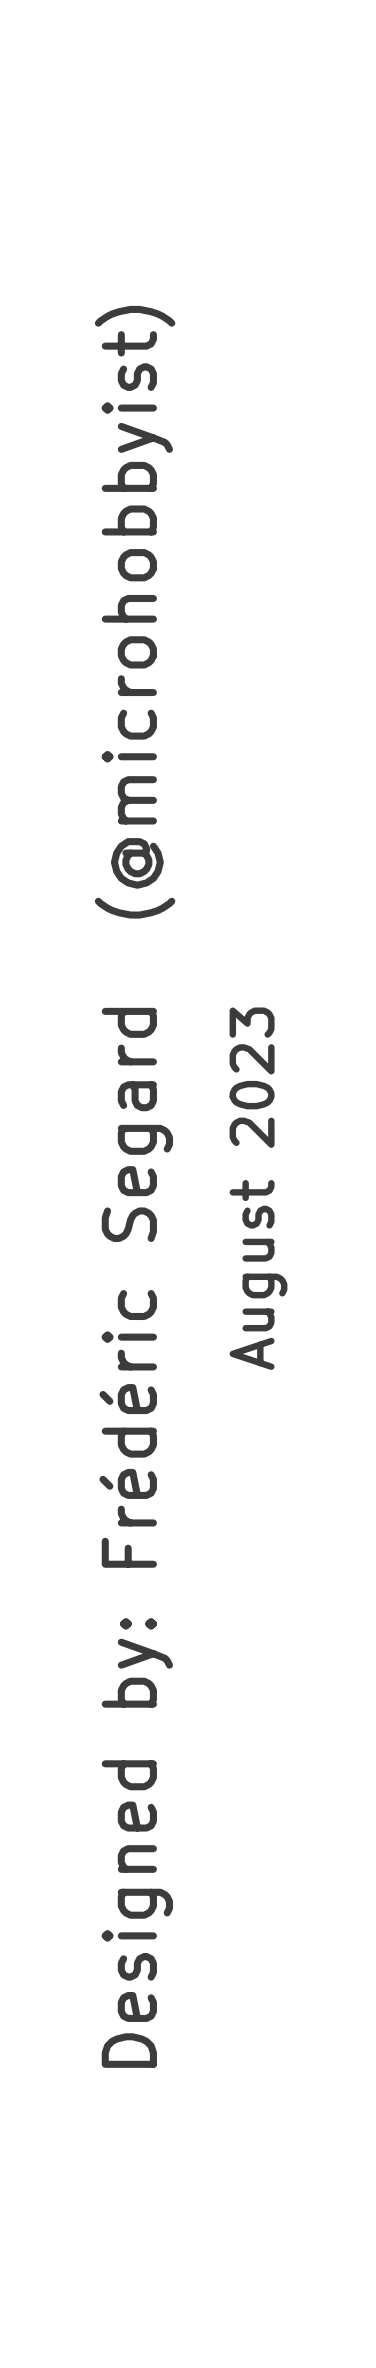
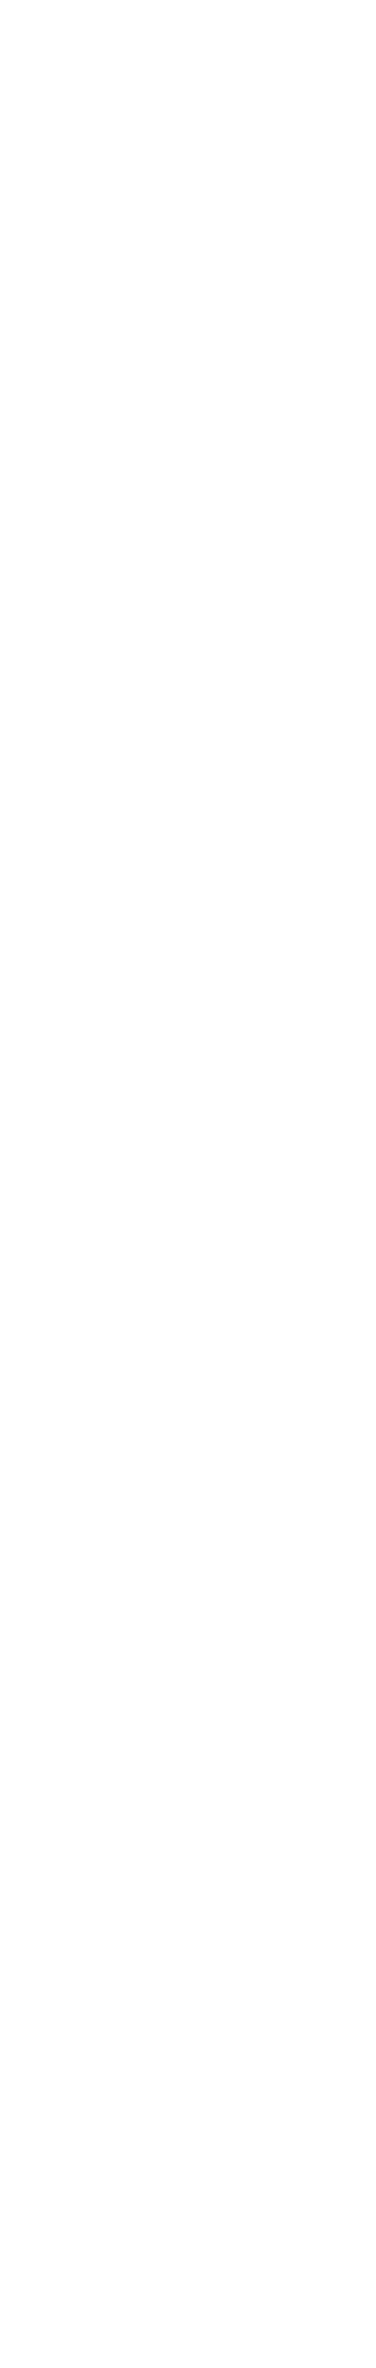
text: Designed by: Frédéric Segard (@microhobbyist) (135, 1186) -> none
text: August 2023 (258, 1188) -> none

